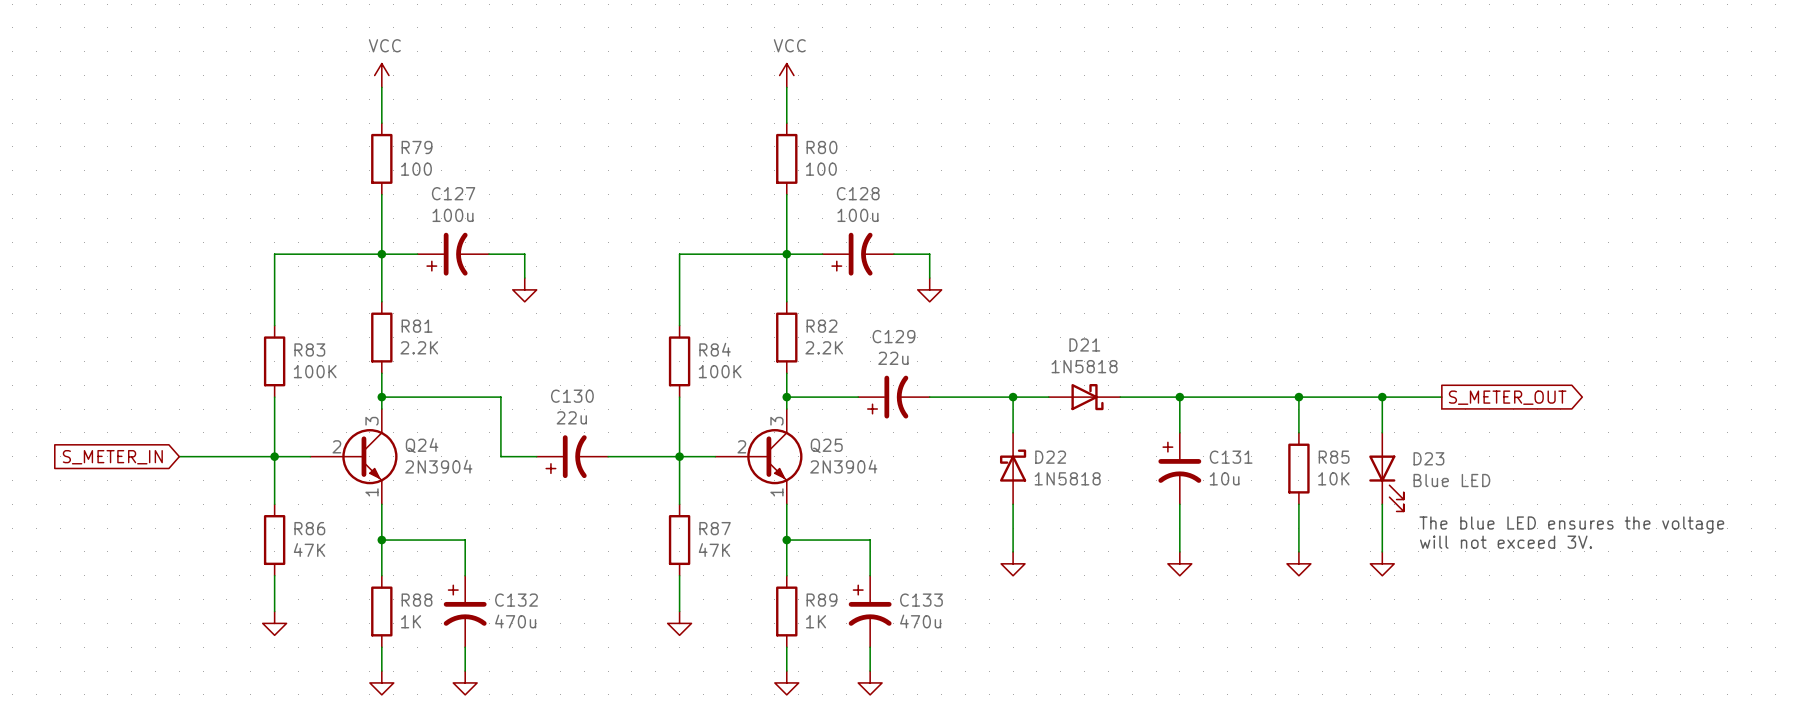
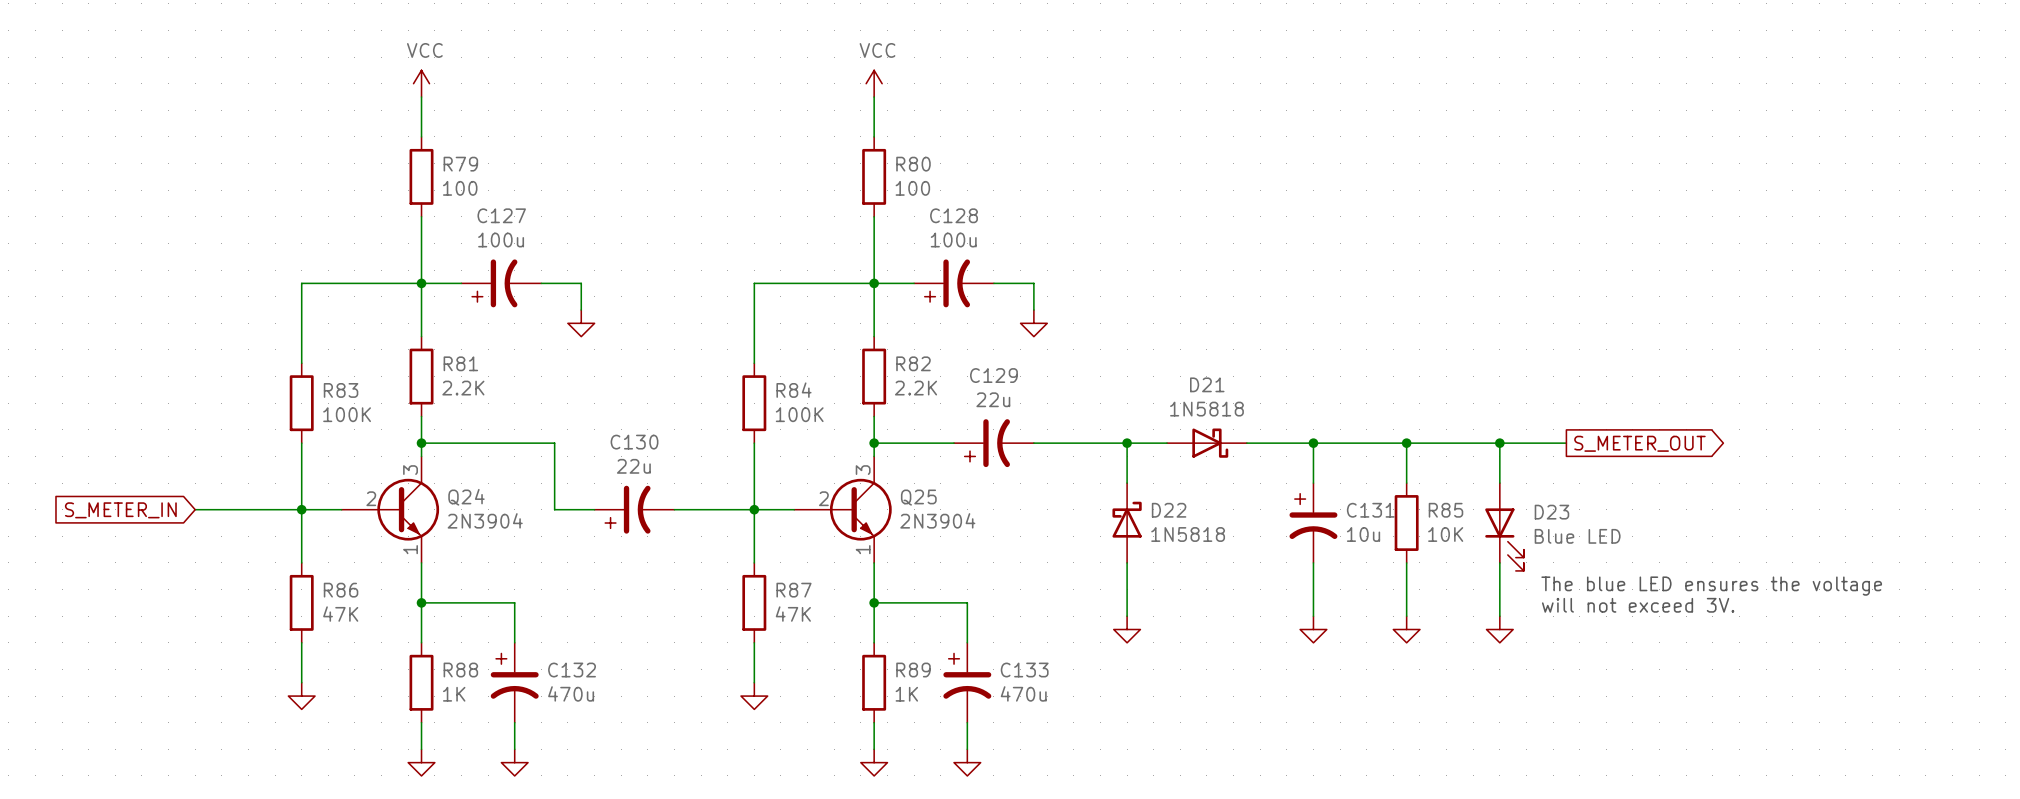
junction: none -> (1406, 443)
wire: (1298, 397) (1298, 432) -> (1406, 443) (1406, 483)
junction: (1298, 397) -> none
junction: none -> (1499, 443)
wire: (1382, 397) (1382, 432) -> (1499, 443) (1499, 483)
junction: (1382, 397) -> none
wire: (1406, 397) (1441, 397) -> none
global label position: S_METER_OUT (1507, 397) -> S_METER_OUT (1639, 443)
R85 position: (1298, 468) -> (1406, 523)
D23 position: (1386, 472) -> (1504, 527)
wire: (1298, 504) (1298, 551) -> (1406, 562) (1406, 616)
wire: (1382, 504) (1382, 551) -> (1499, 562) (1499, 616)
text position: The blue LED ensures the voltage (1571, 524) -> The blue LED ensures the voltage (1711, 586)
text position: will not exceed 3V. (1506, 542) -> will not exceed 3V. (1638, 605)
power symbol: none -> (1406, 629)
power symbol: (1298, 563) -> none
power symbol: none -> (1499, 629)
power symbol: (1382, 563) -> none

